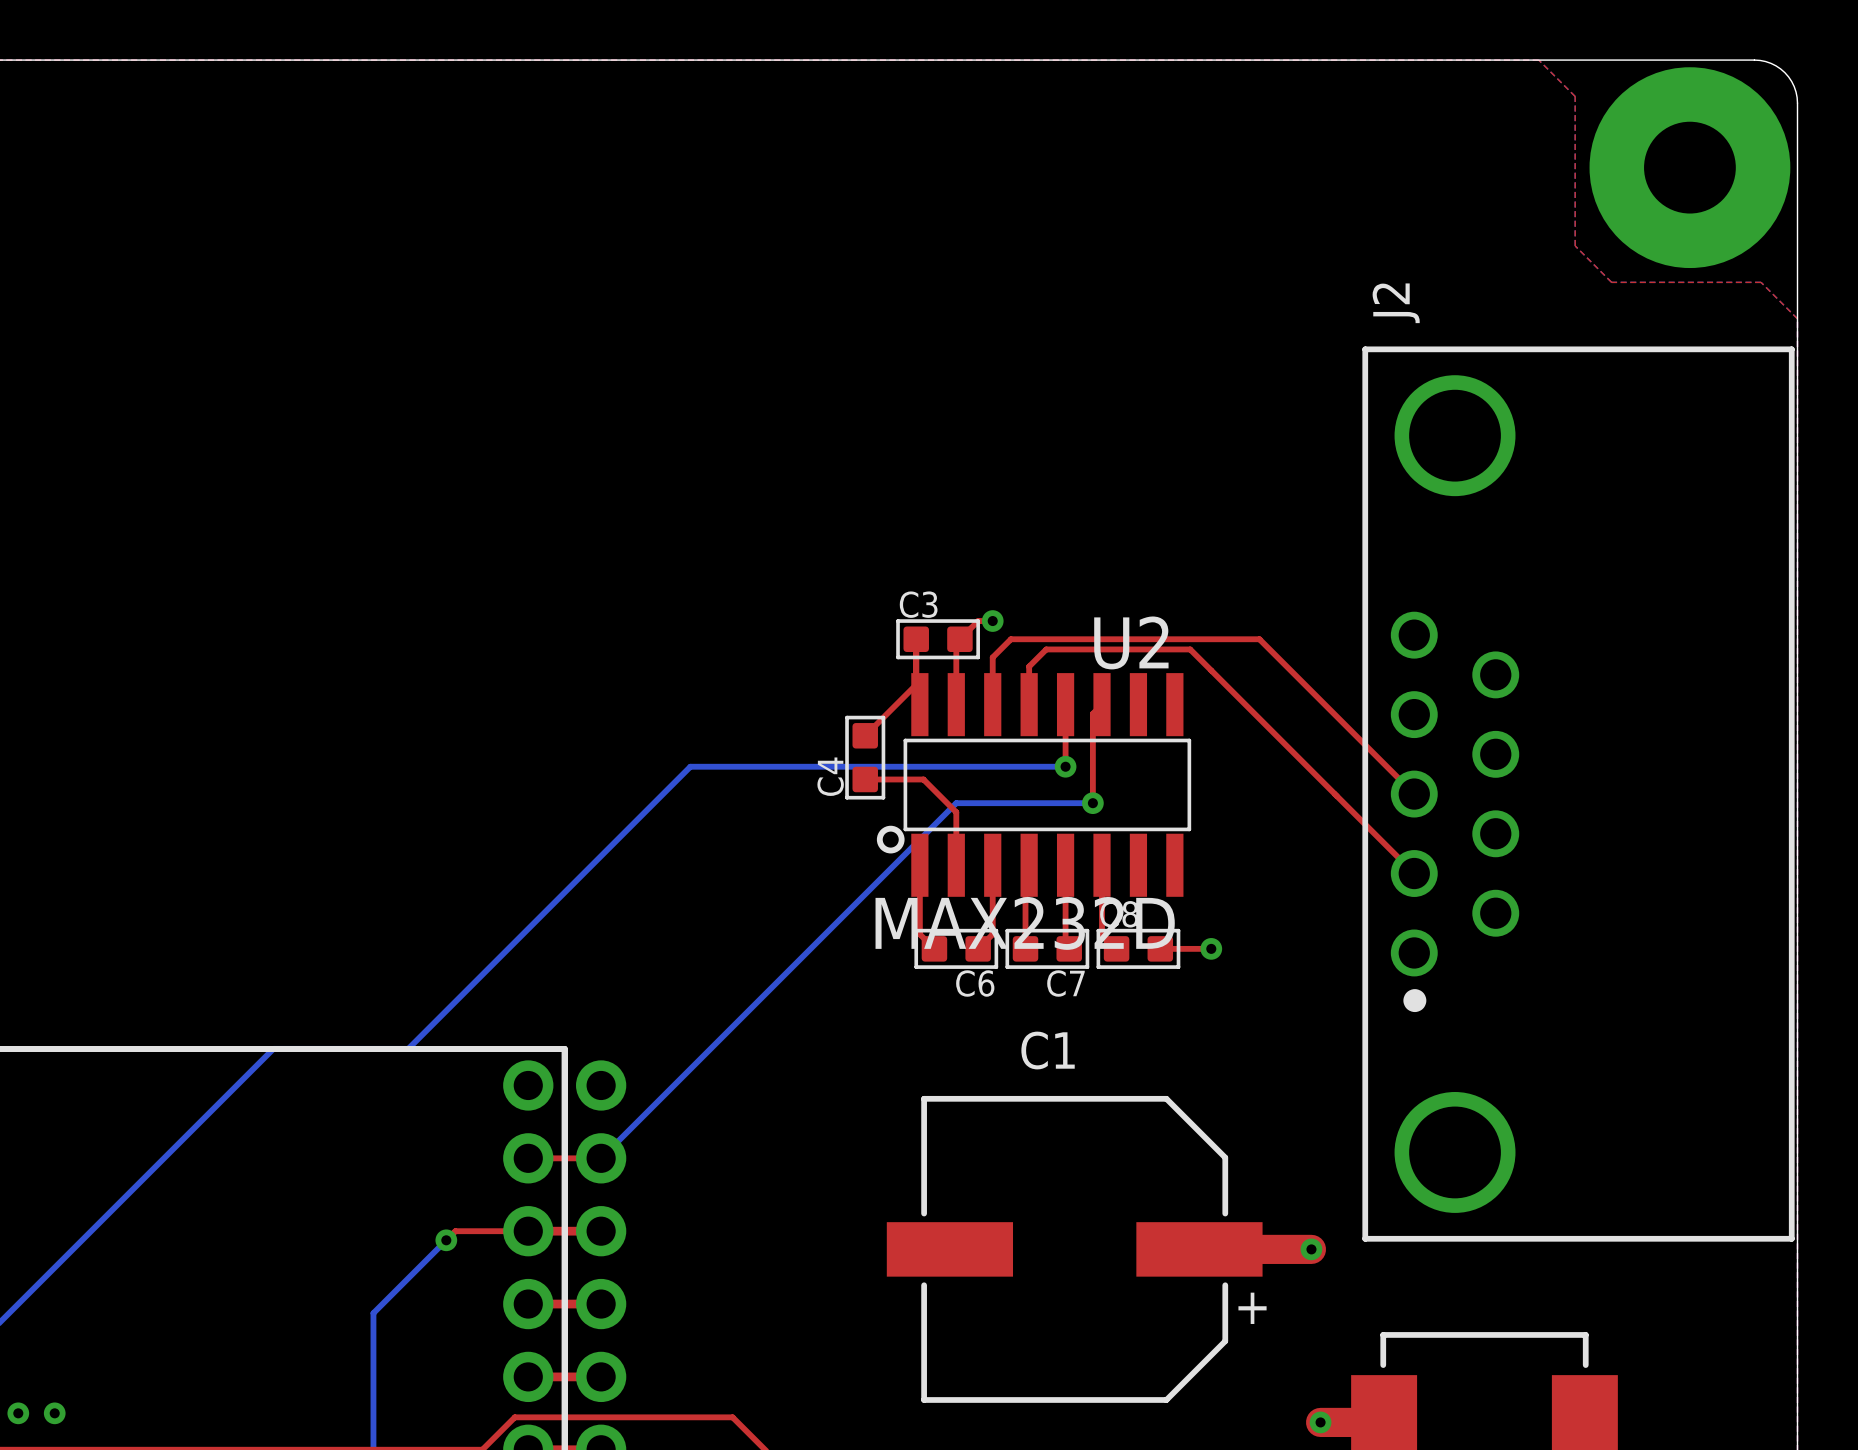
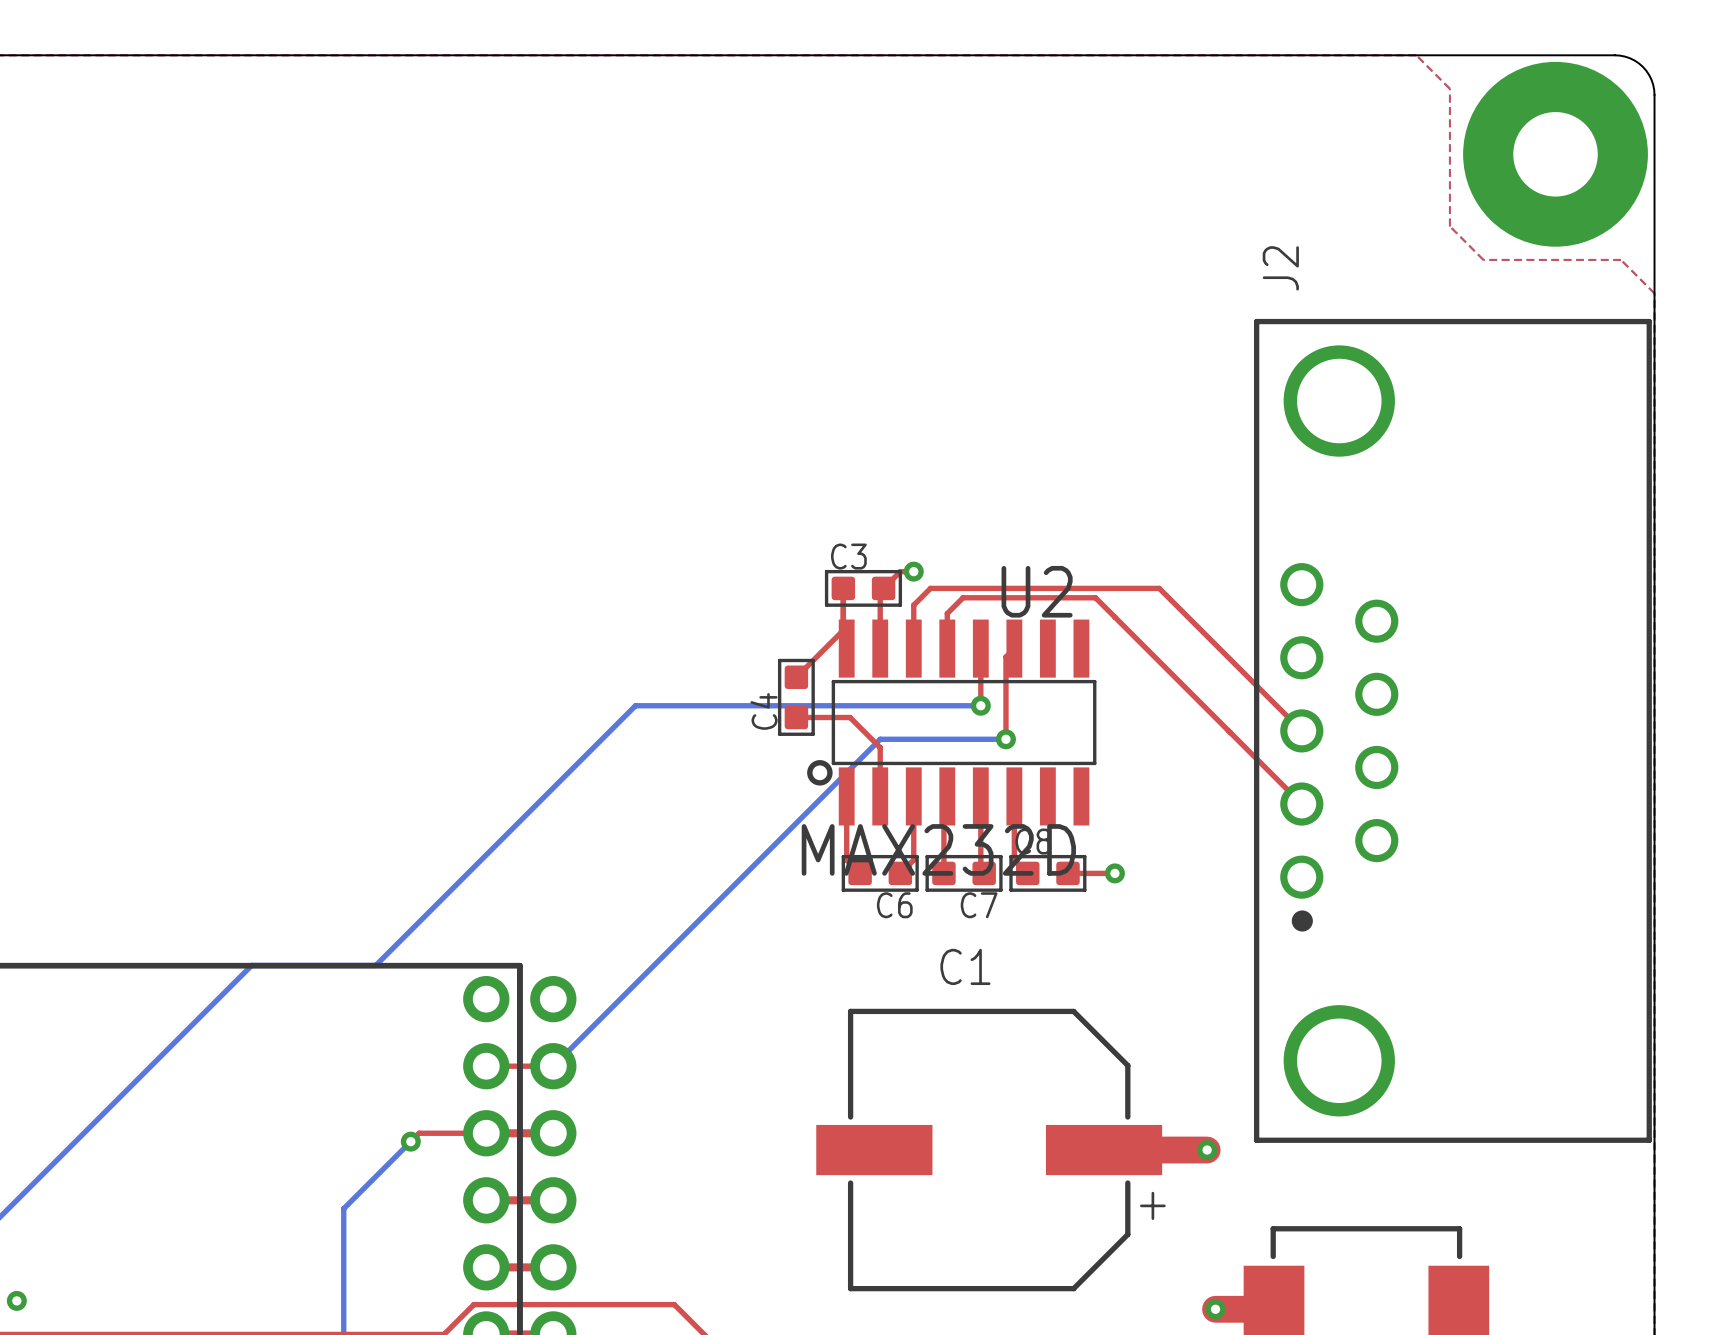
via: (54, 1413) -> none

